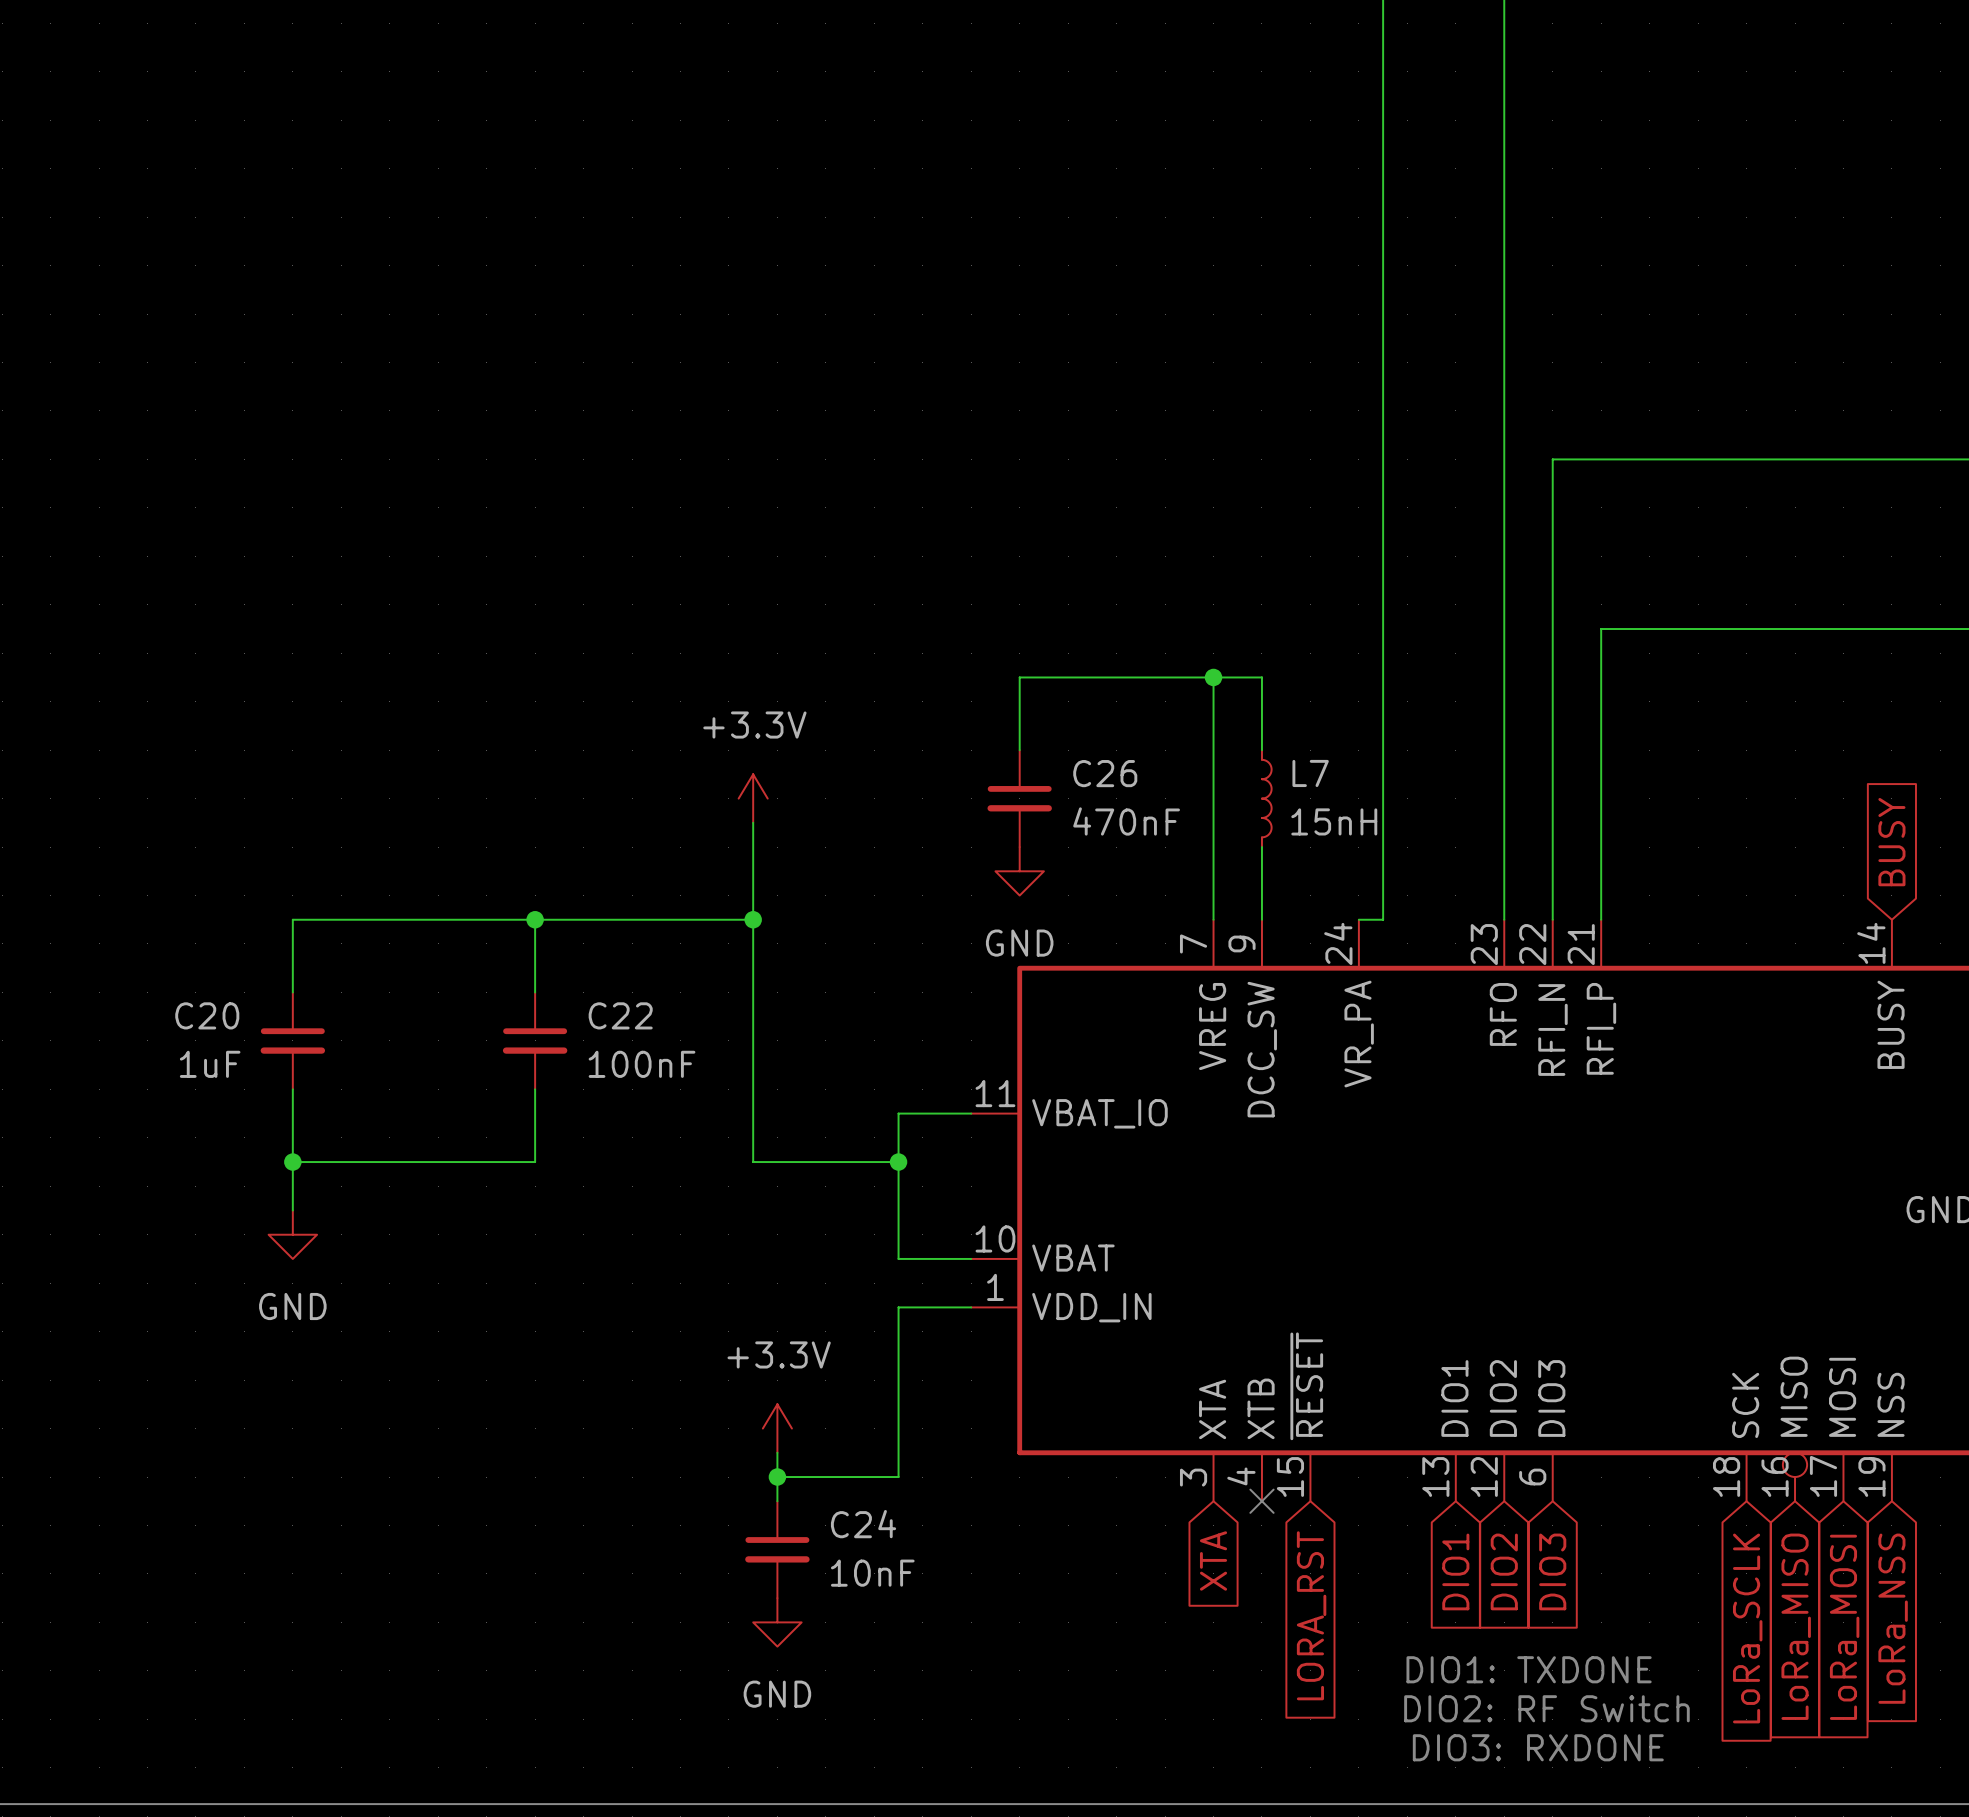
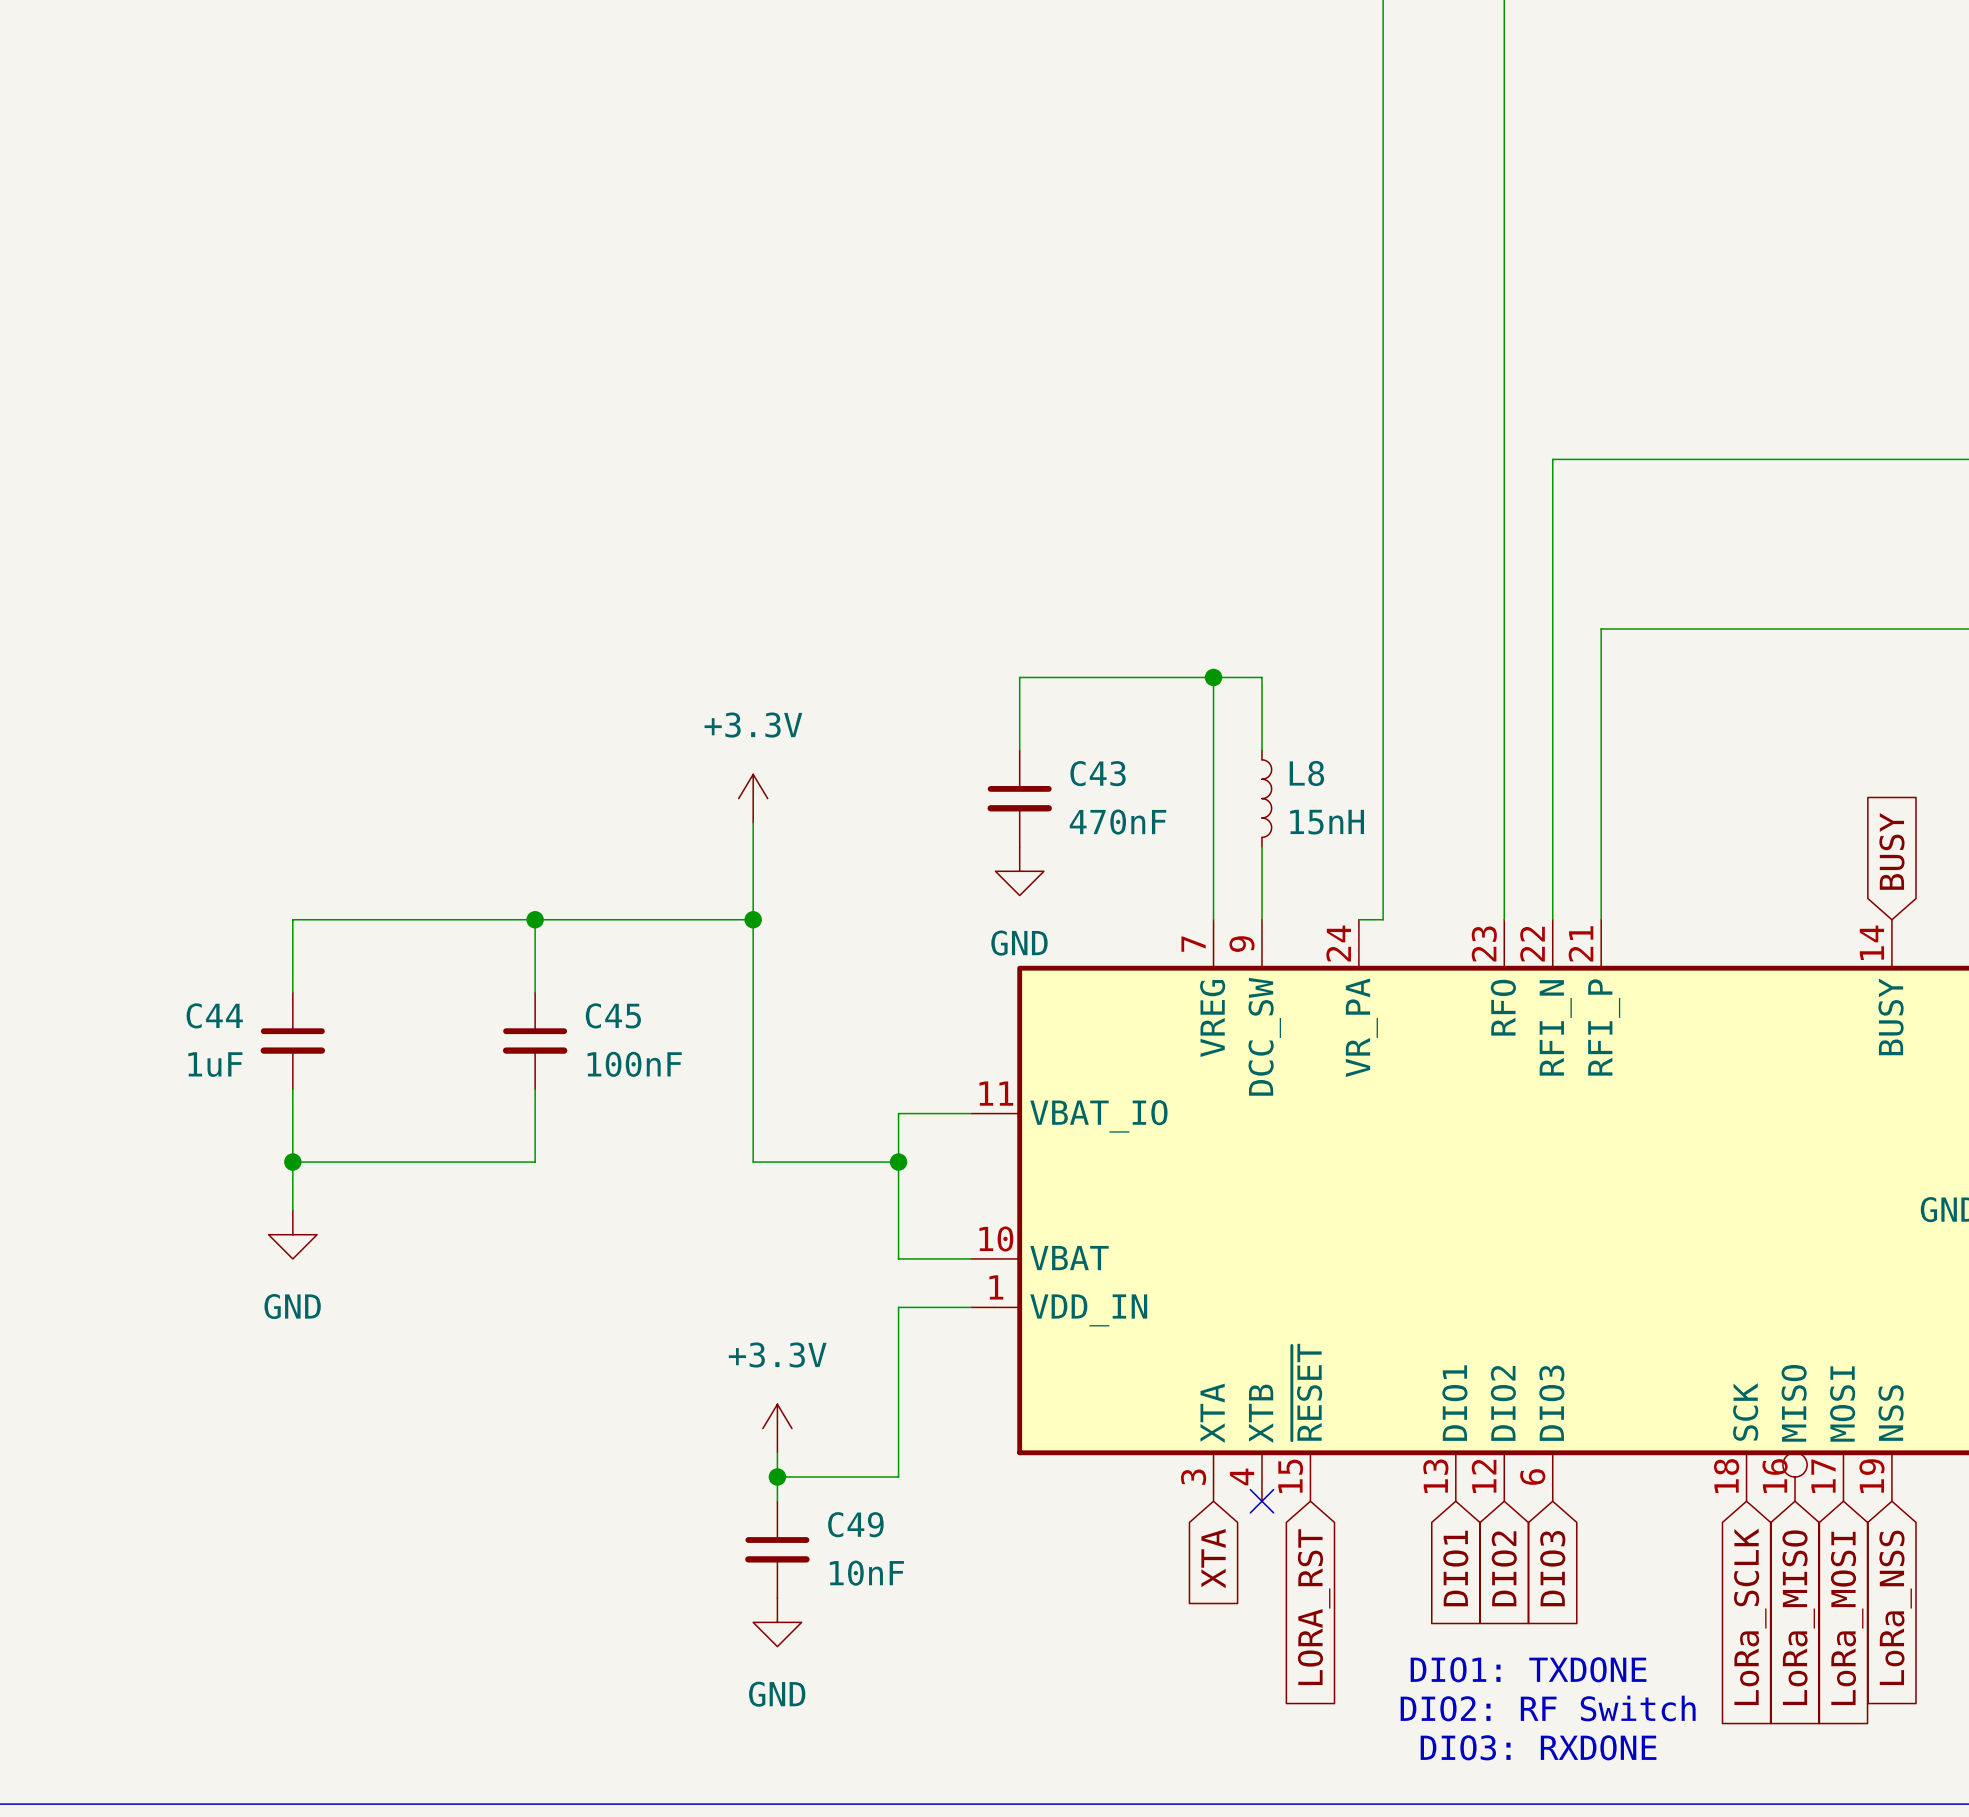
C26 name: C26 (1105, 773) -> C43 (1098, 773)
L7 name: L7 (1310, 773) -> L8 (1306, 773)
C20 name: C20 (207, 1015) -> C44 (214, 1015)
C22 name: C22 (620, 1015) -> C45 (613, 1015)
C24 name: C24 (863, 1524) -> C49 (855, 1524)

